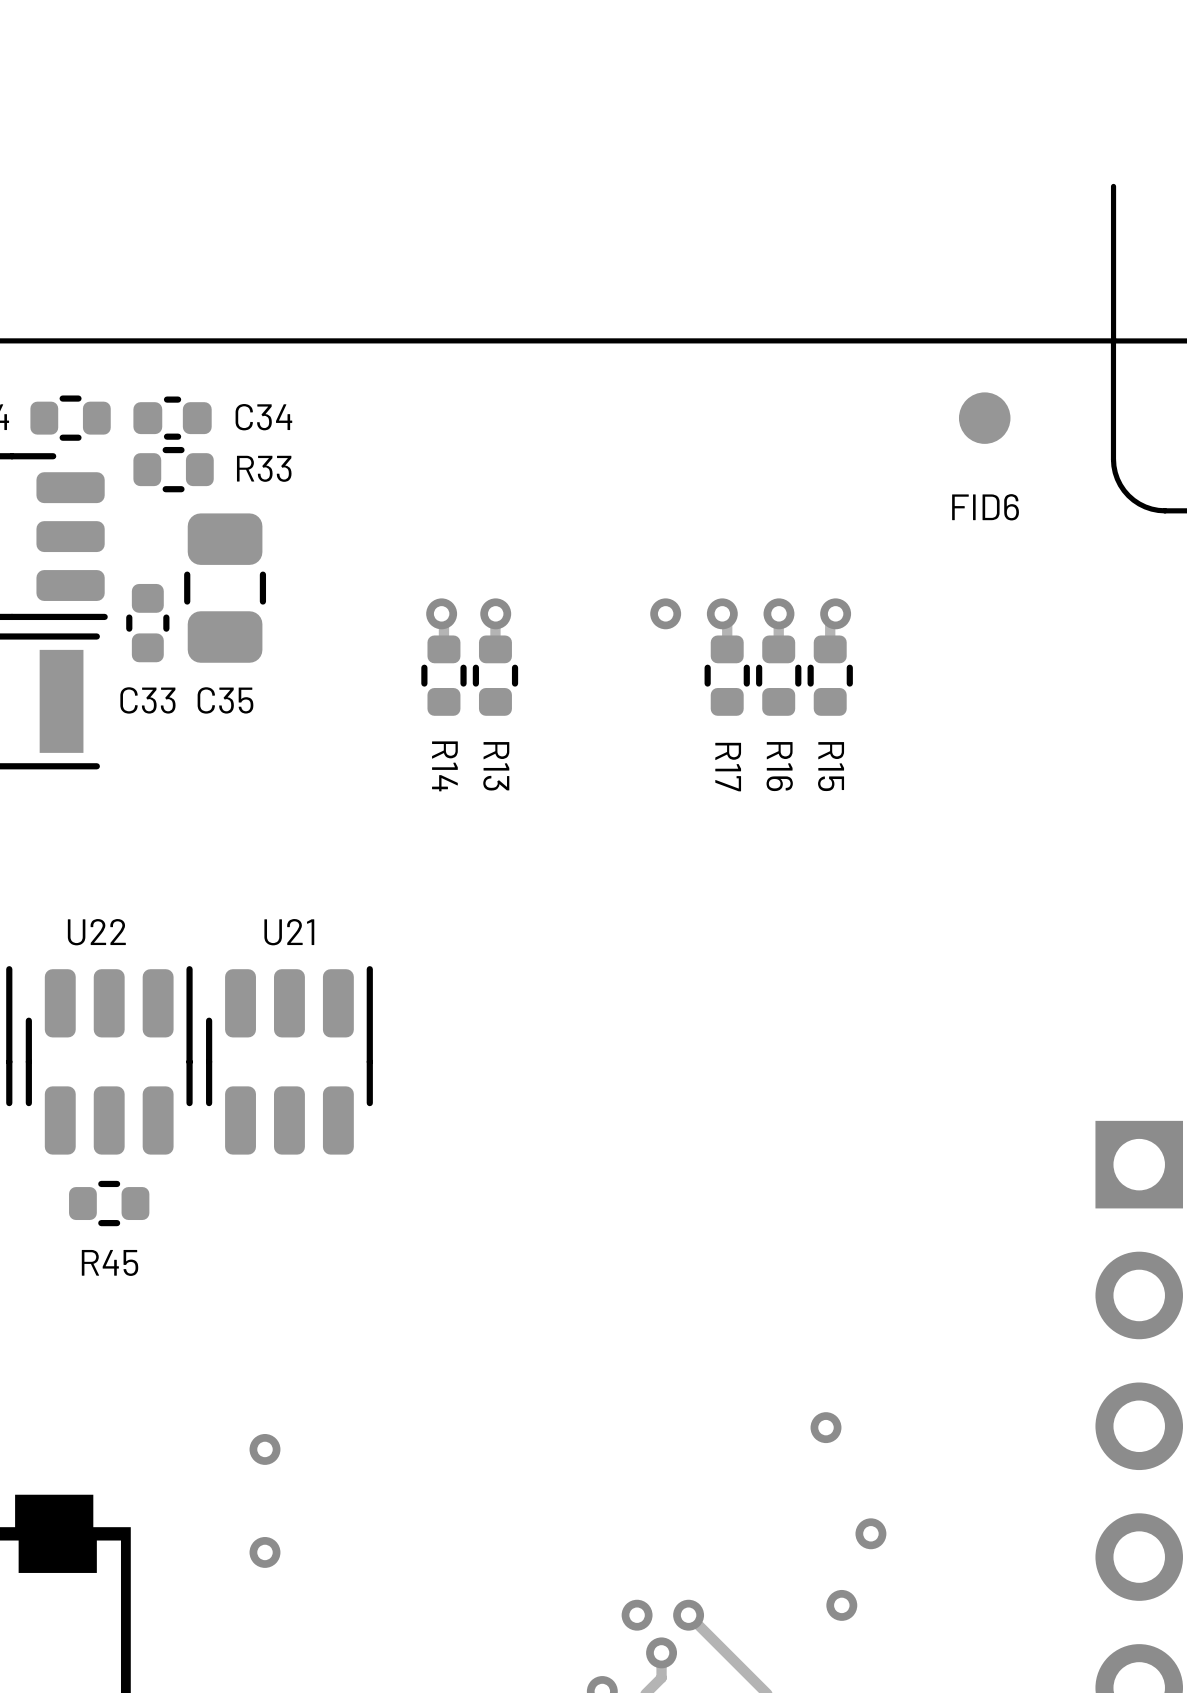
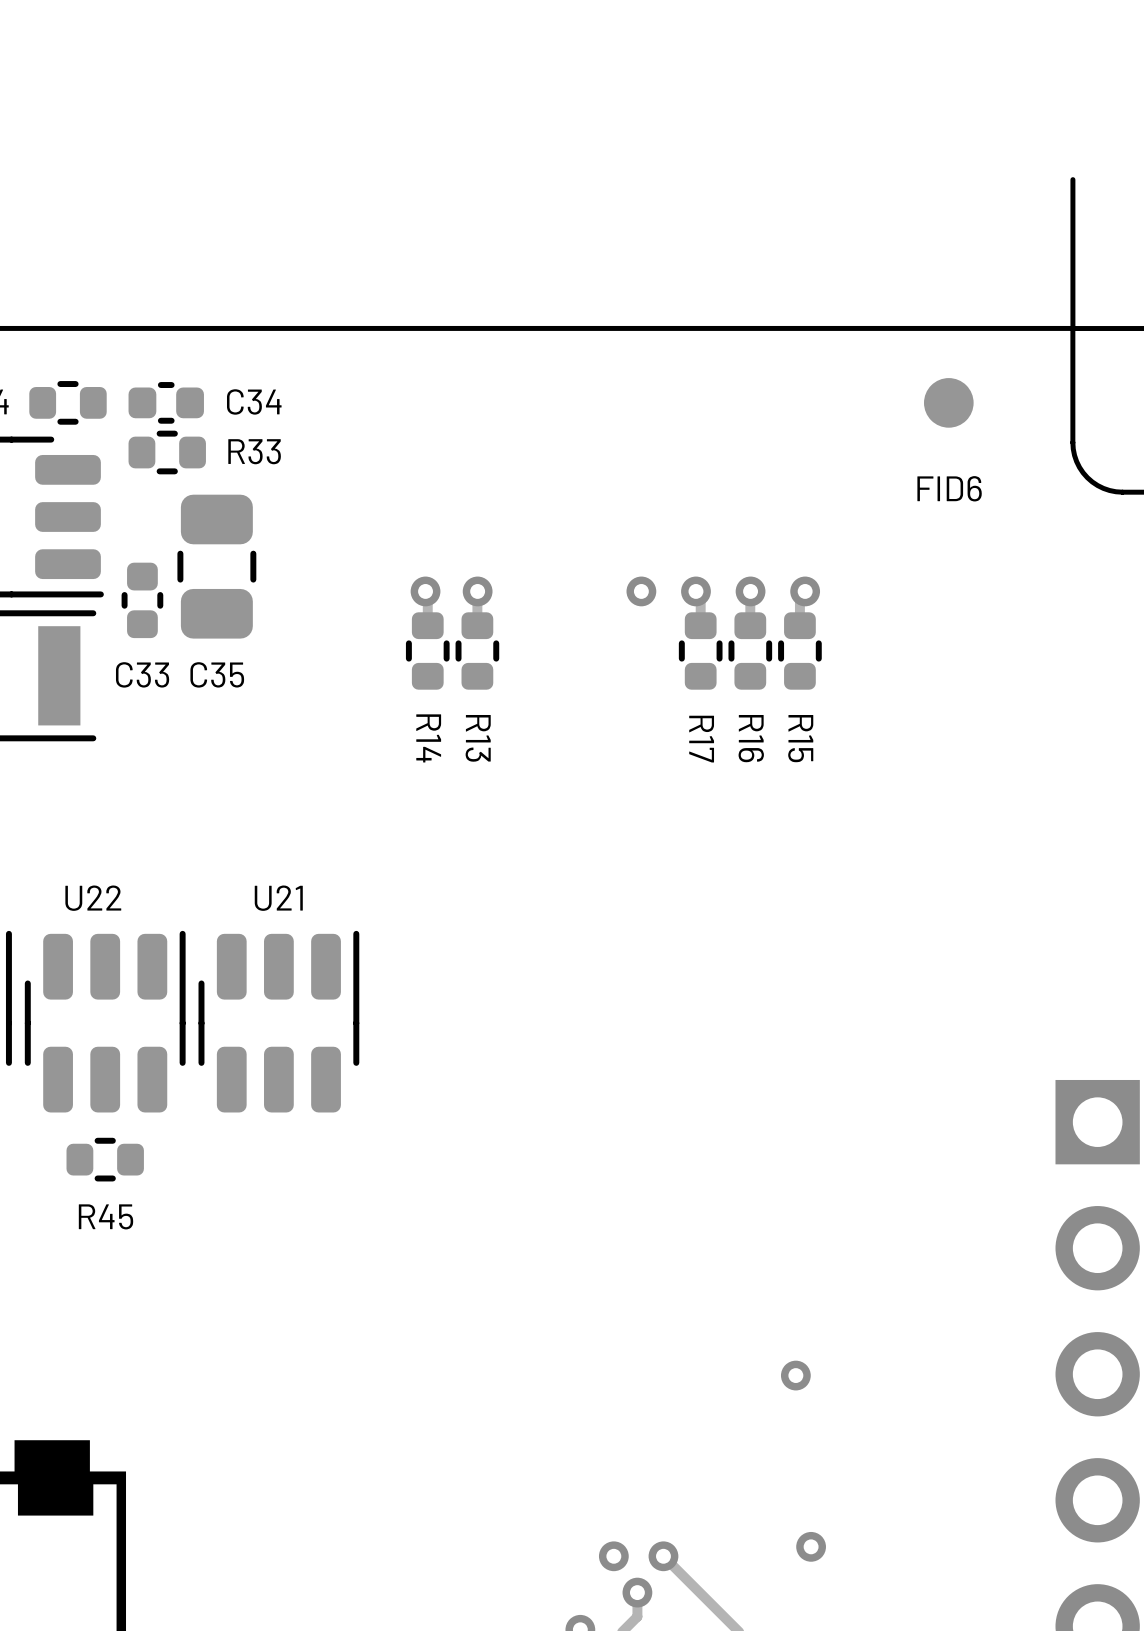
via: (264, 1449) -> none
via: (870, 1533) -> none
via: (264, 1552) -> none

